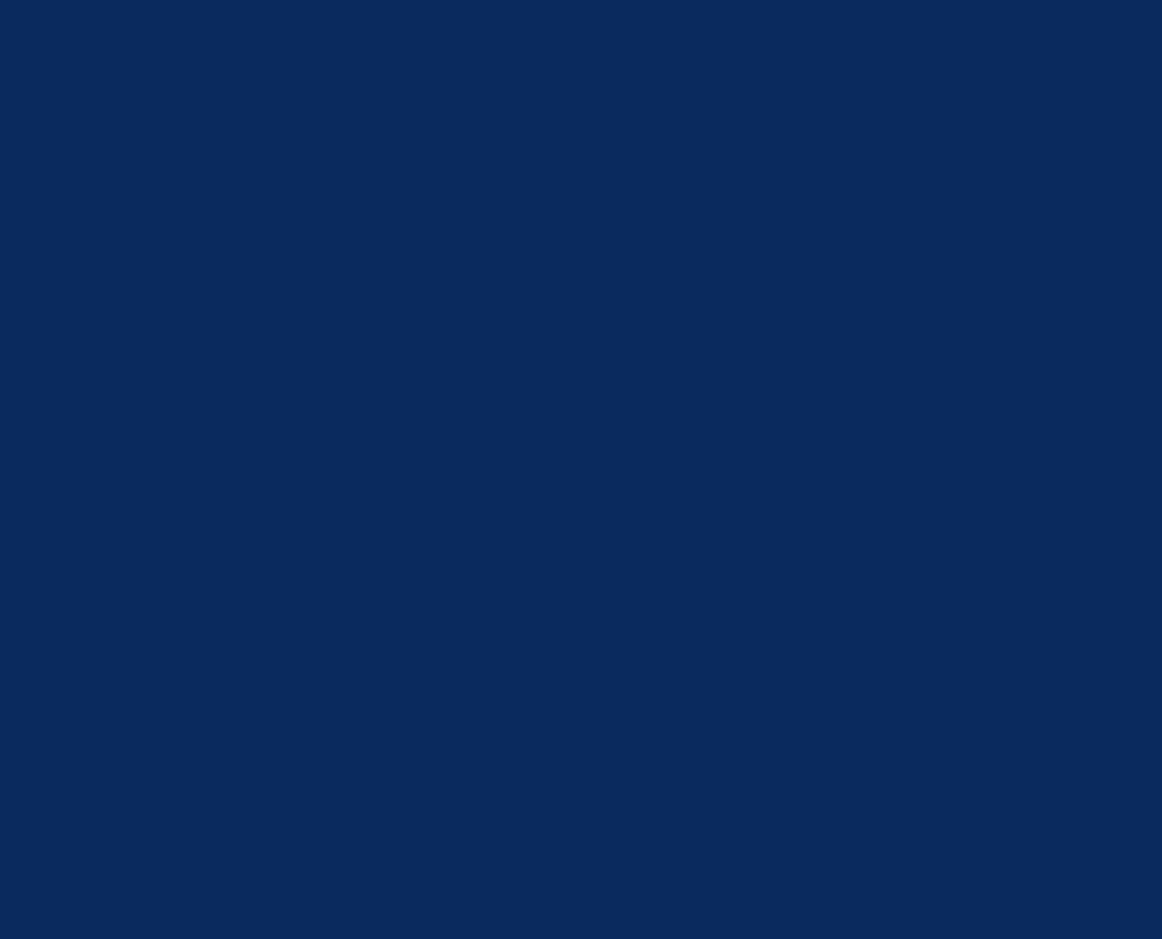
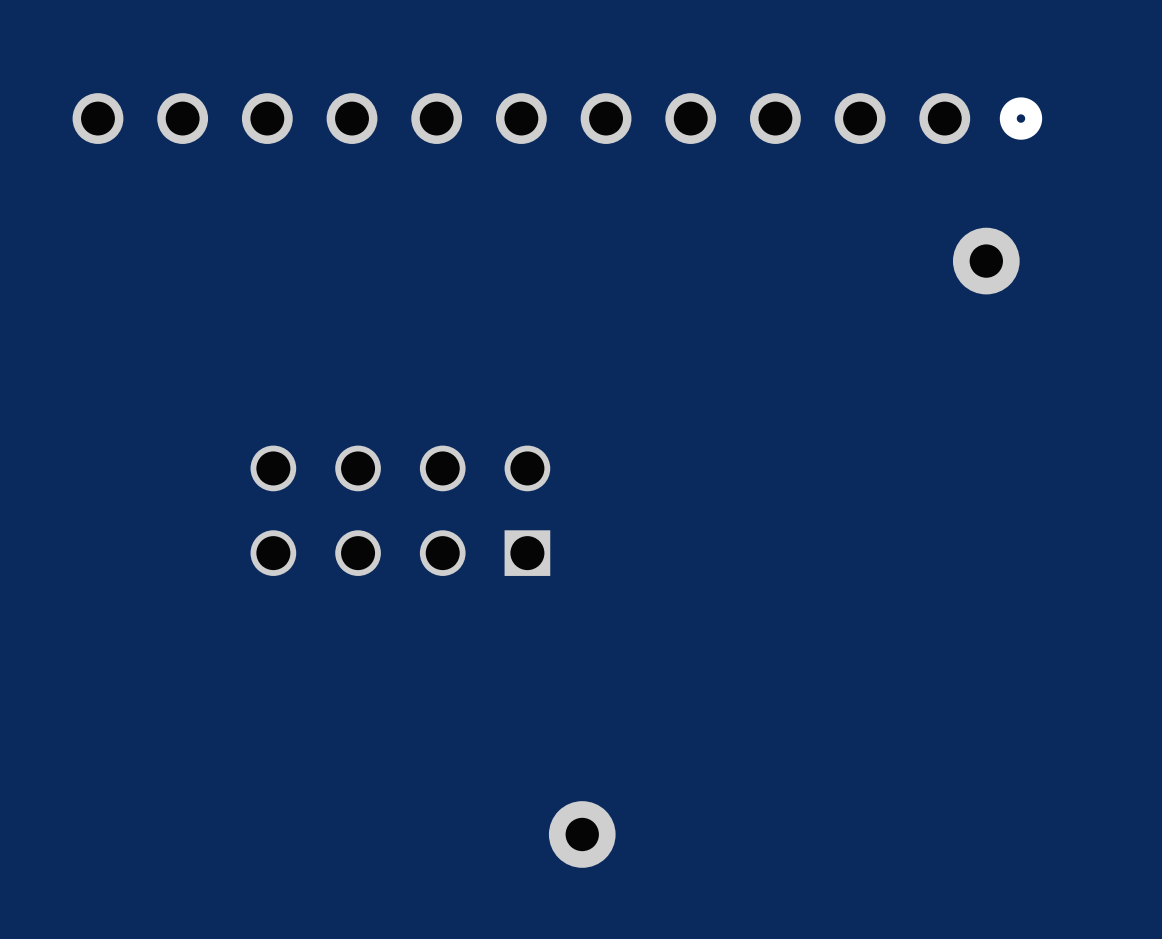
part: none -> (557, 118)
part: none -> (986, 261)
part: none -> (400, 510)
part: none -> (582, 834)

